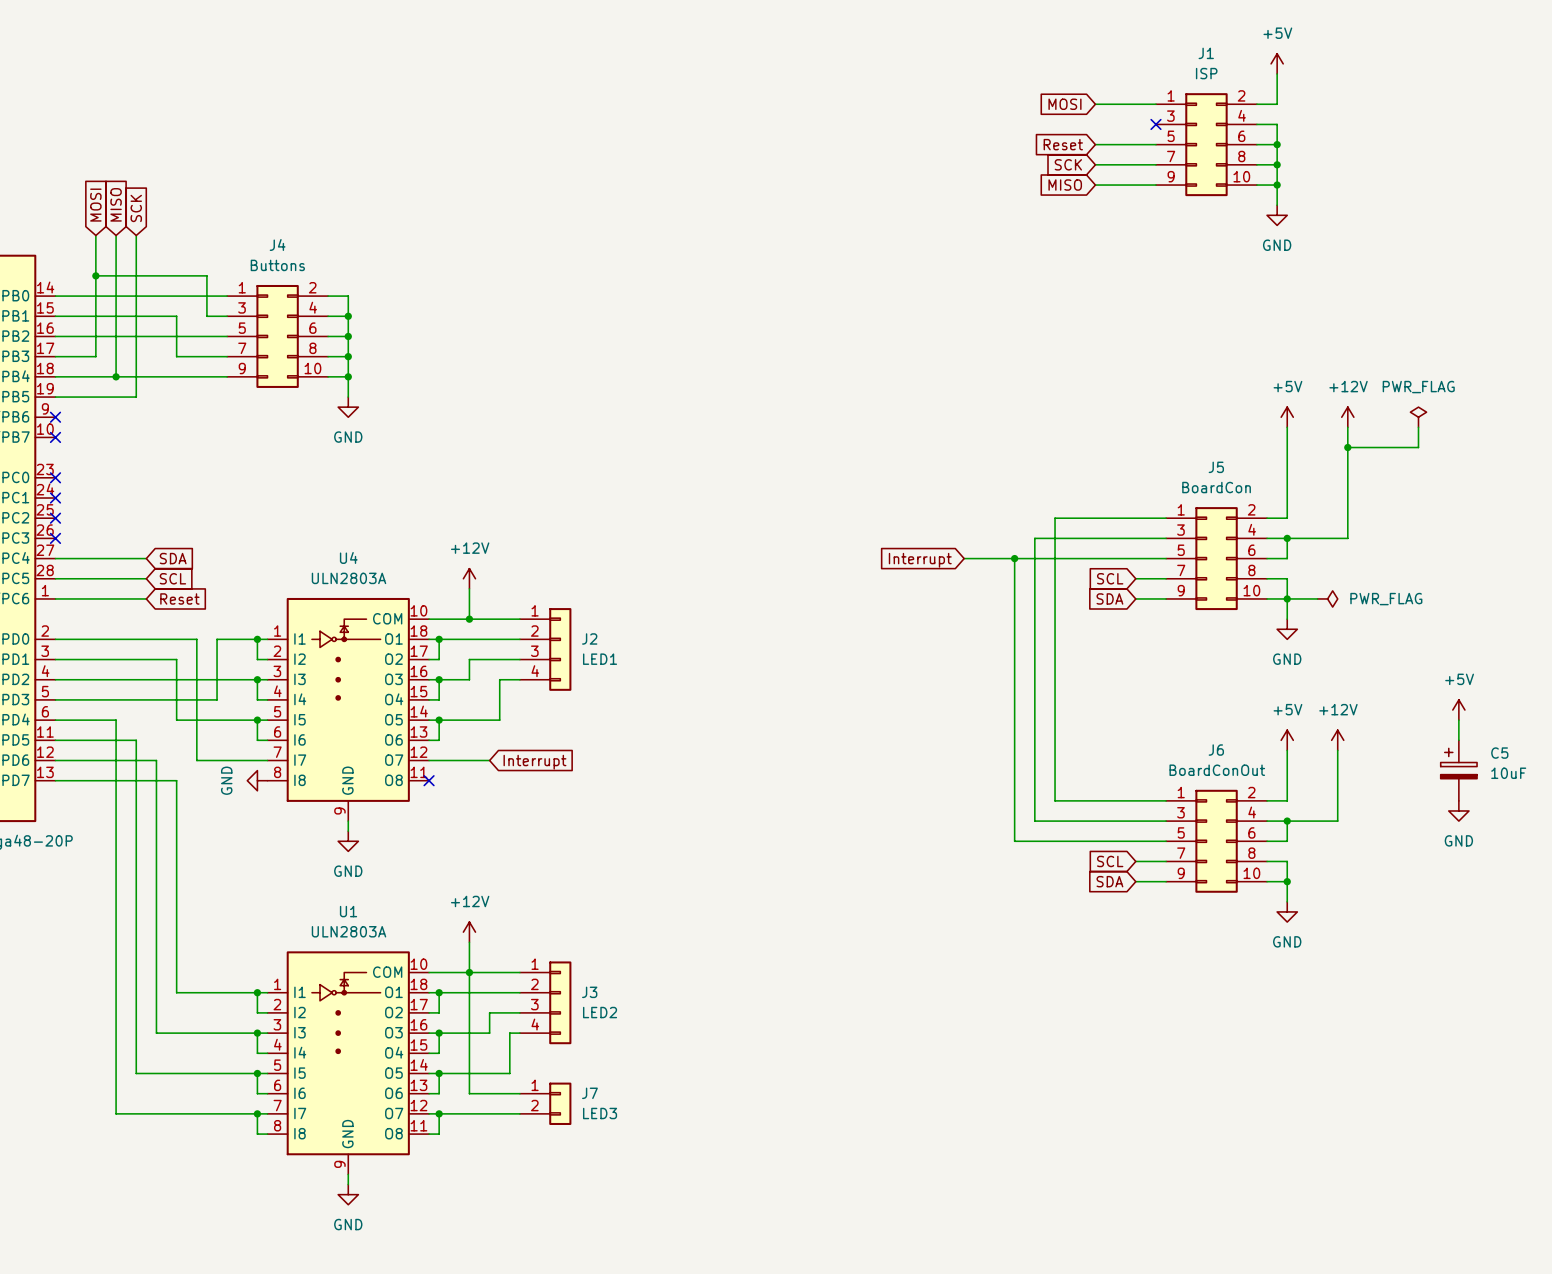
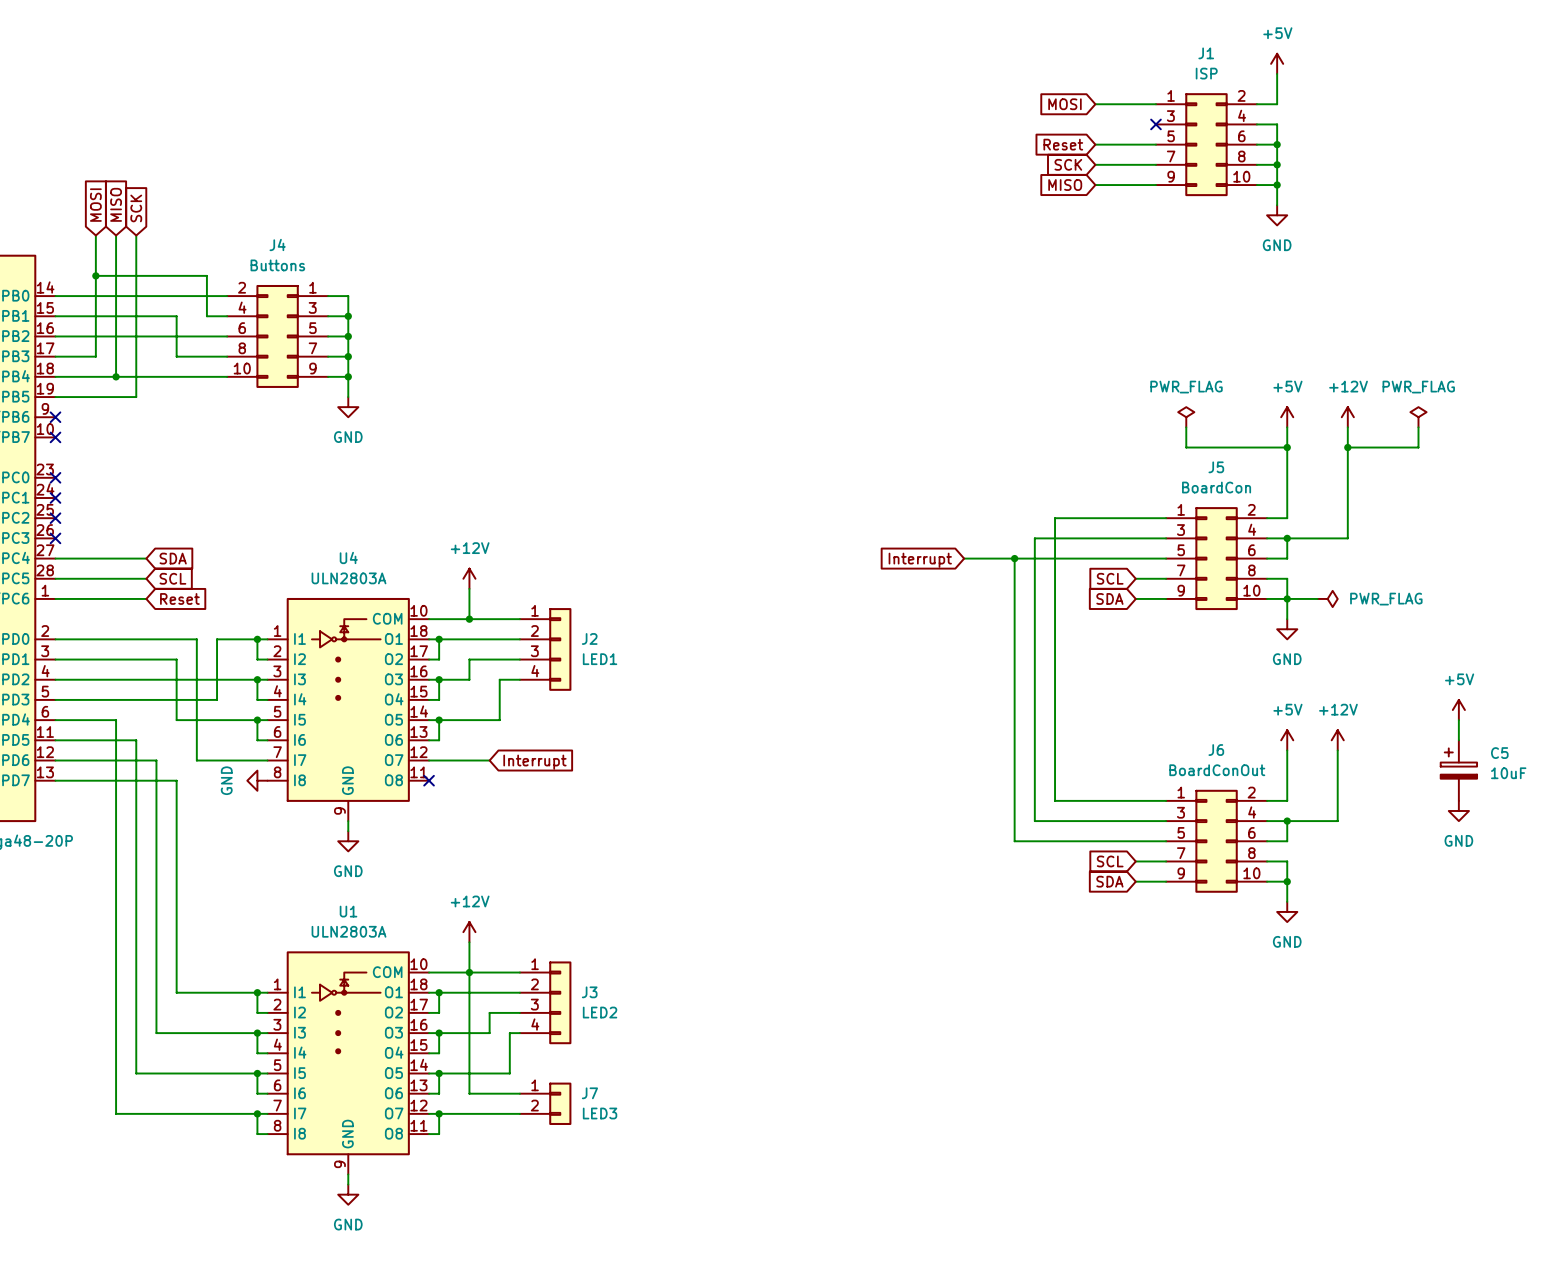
J4 flip: as is (277, 336) -> left-right (277, 336)
power symbol: none -> PWR_FLAG (1186, 417)
wire: none -> (1186, 427) (1186, 447) (1287, 447)
junction: none -> (1287, 447)

